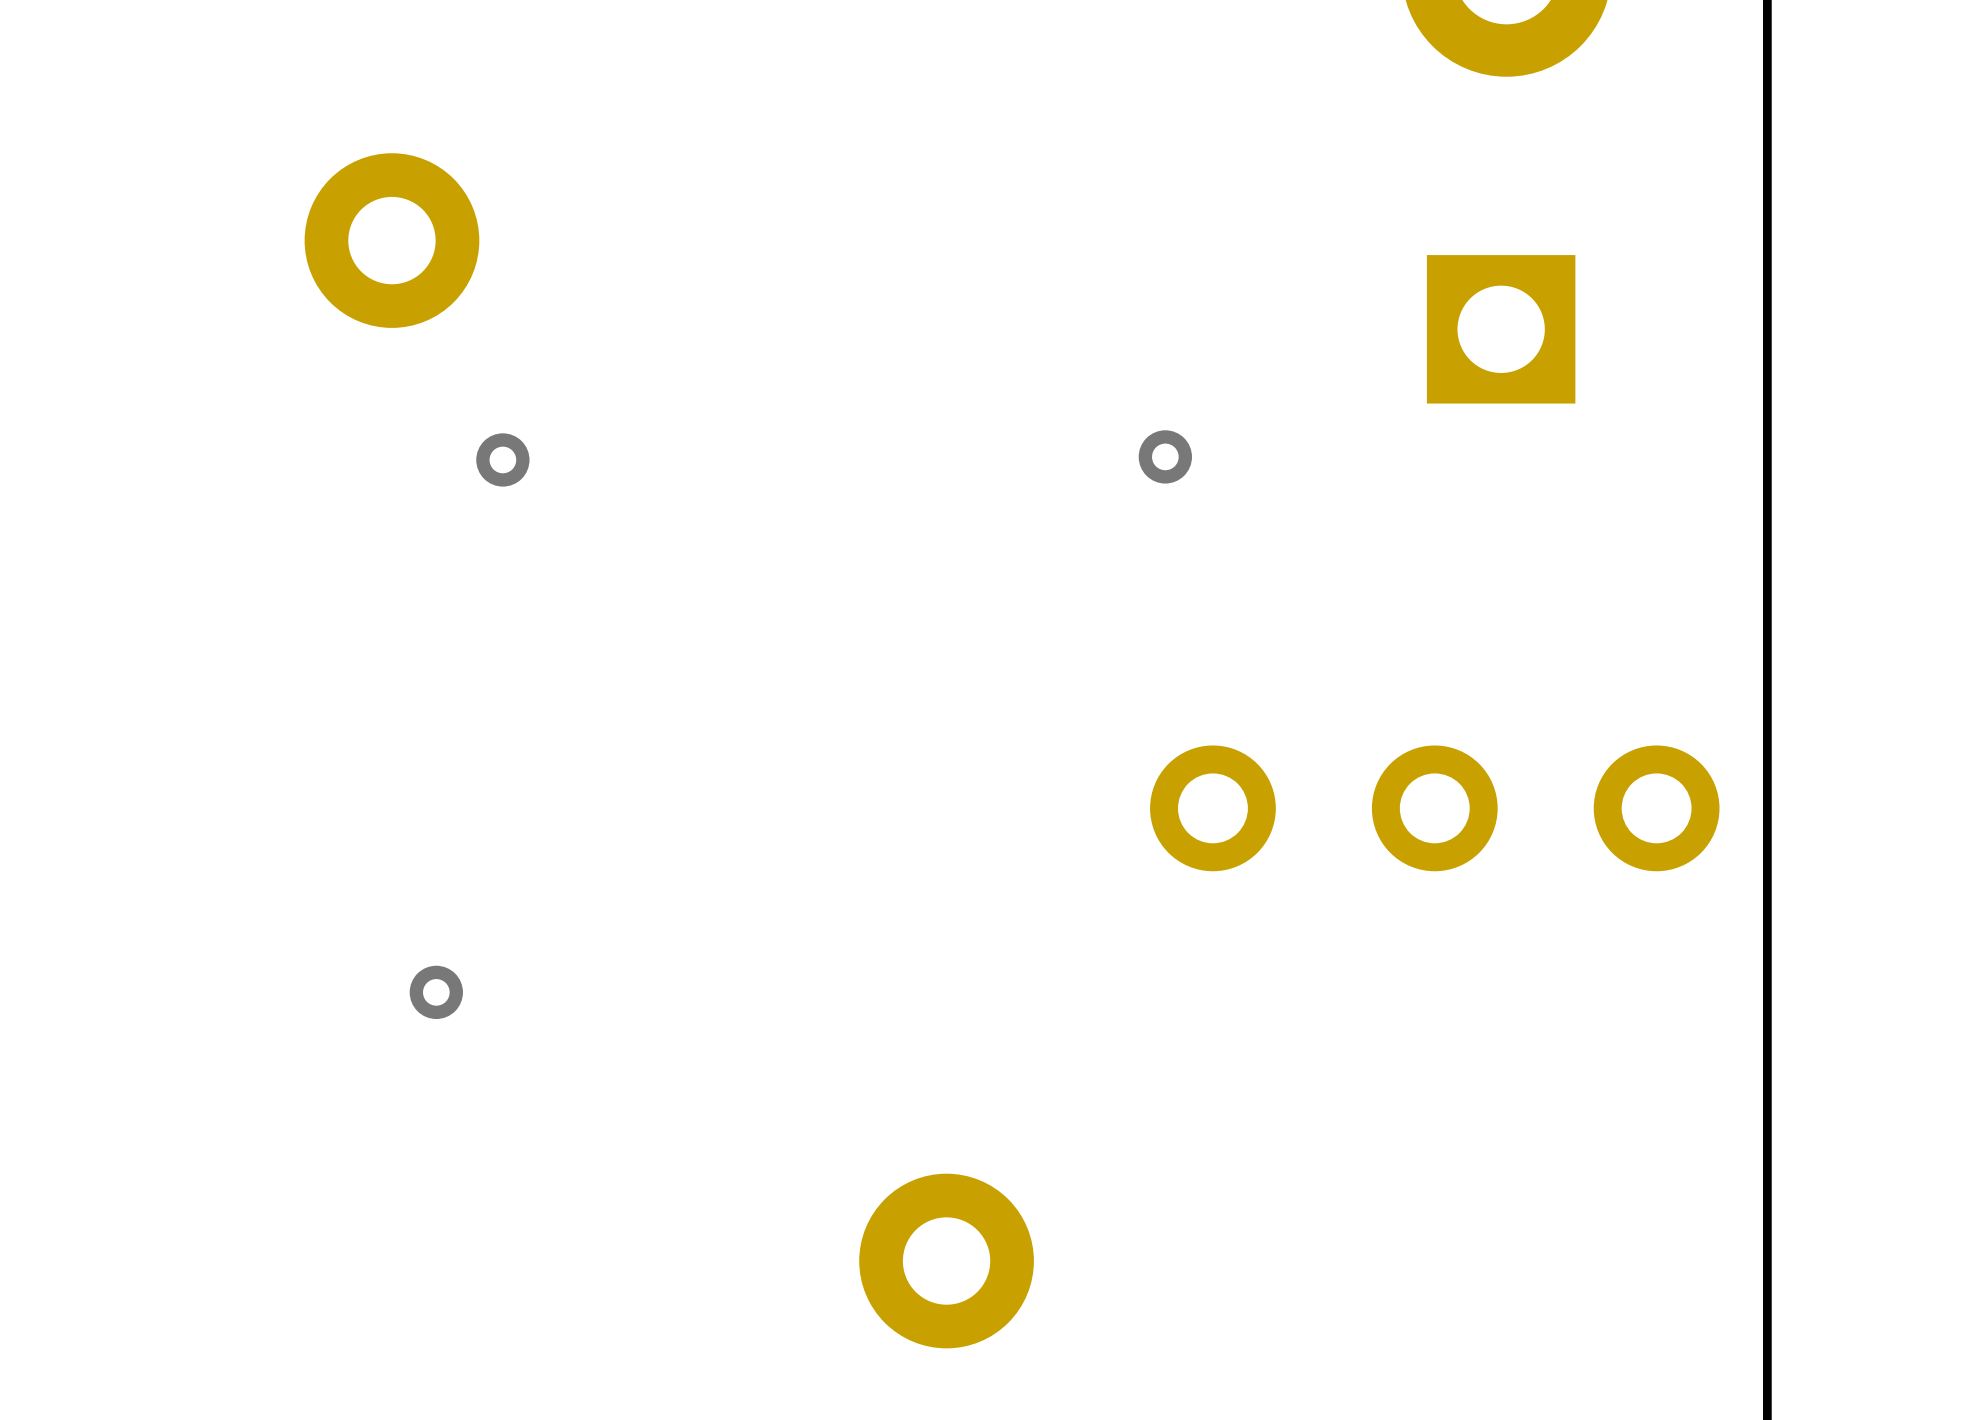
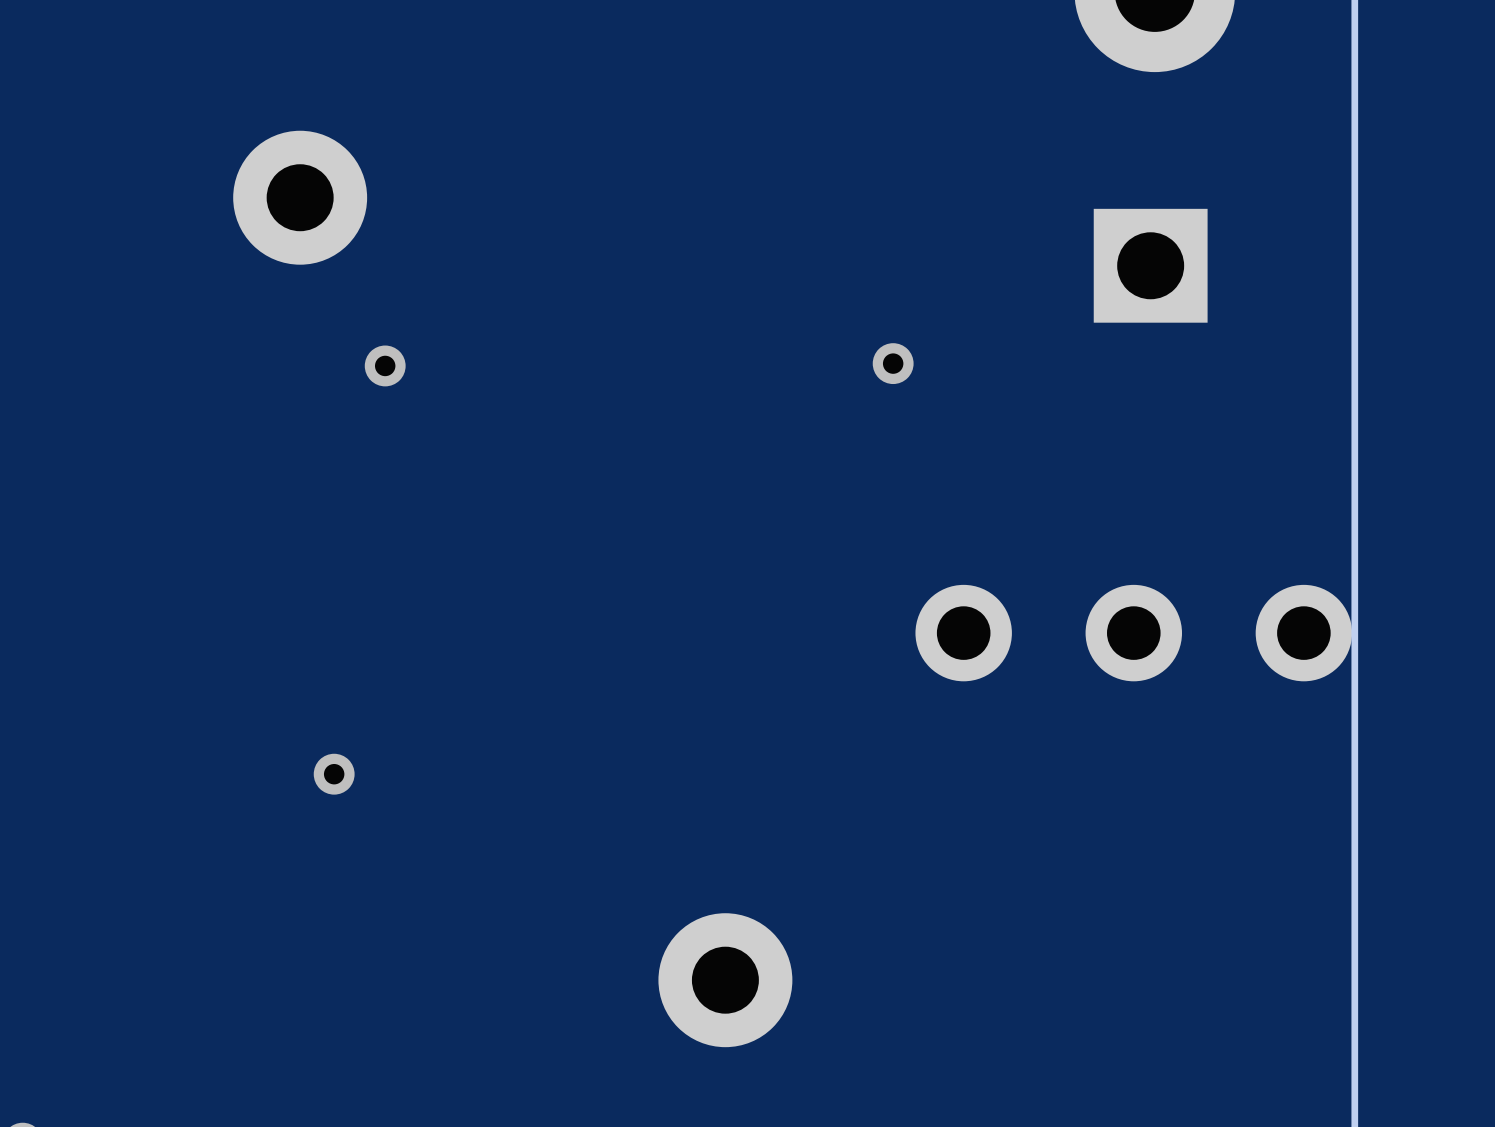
part position: (1434, 808) -> (1133, 633)

